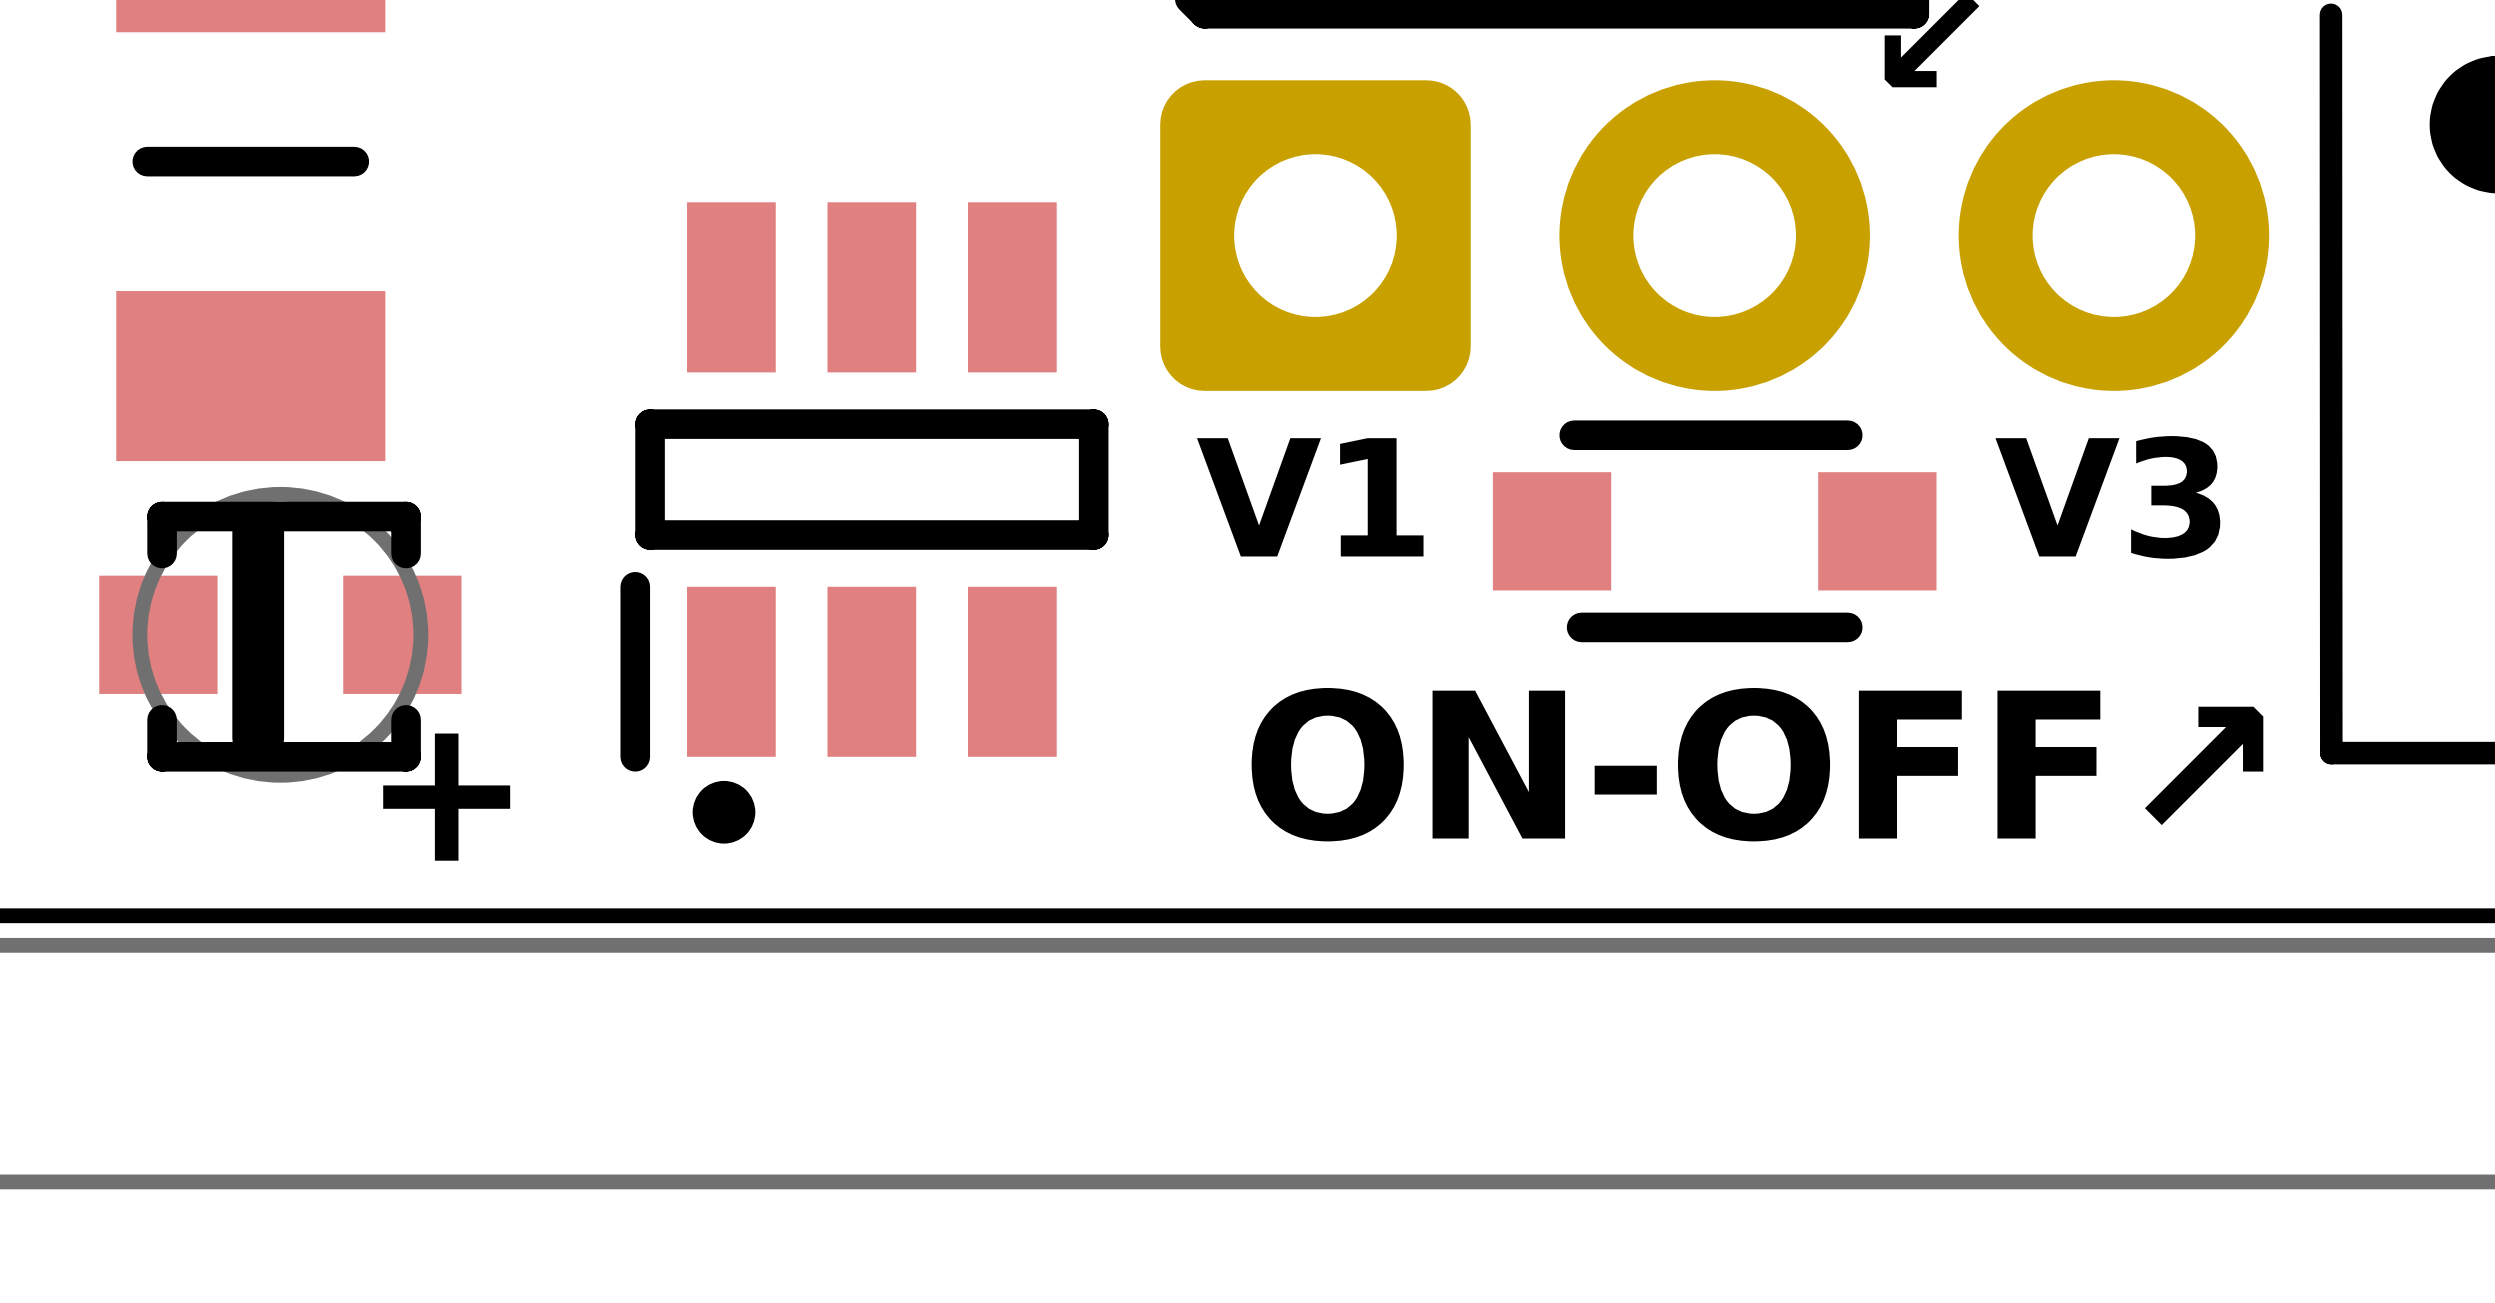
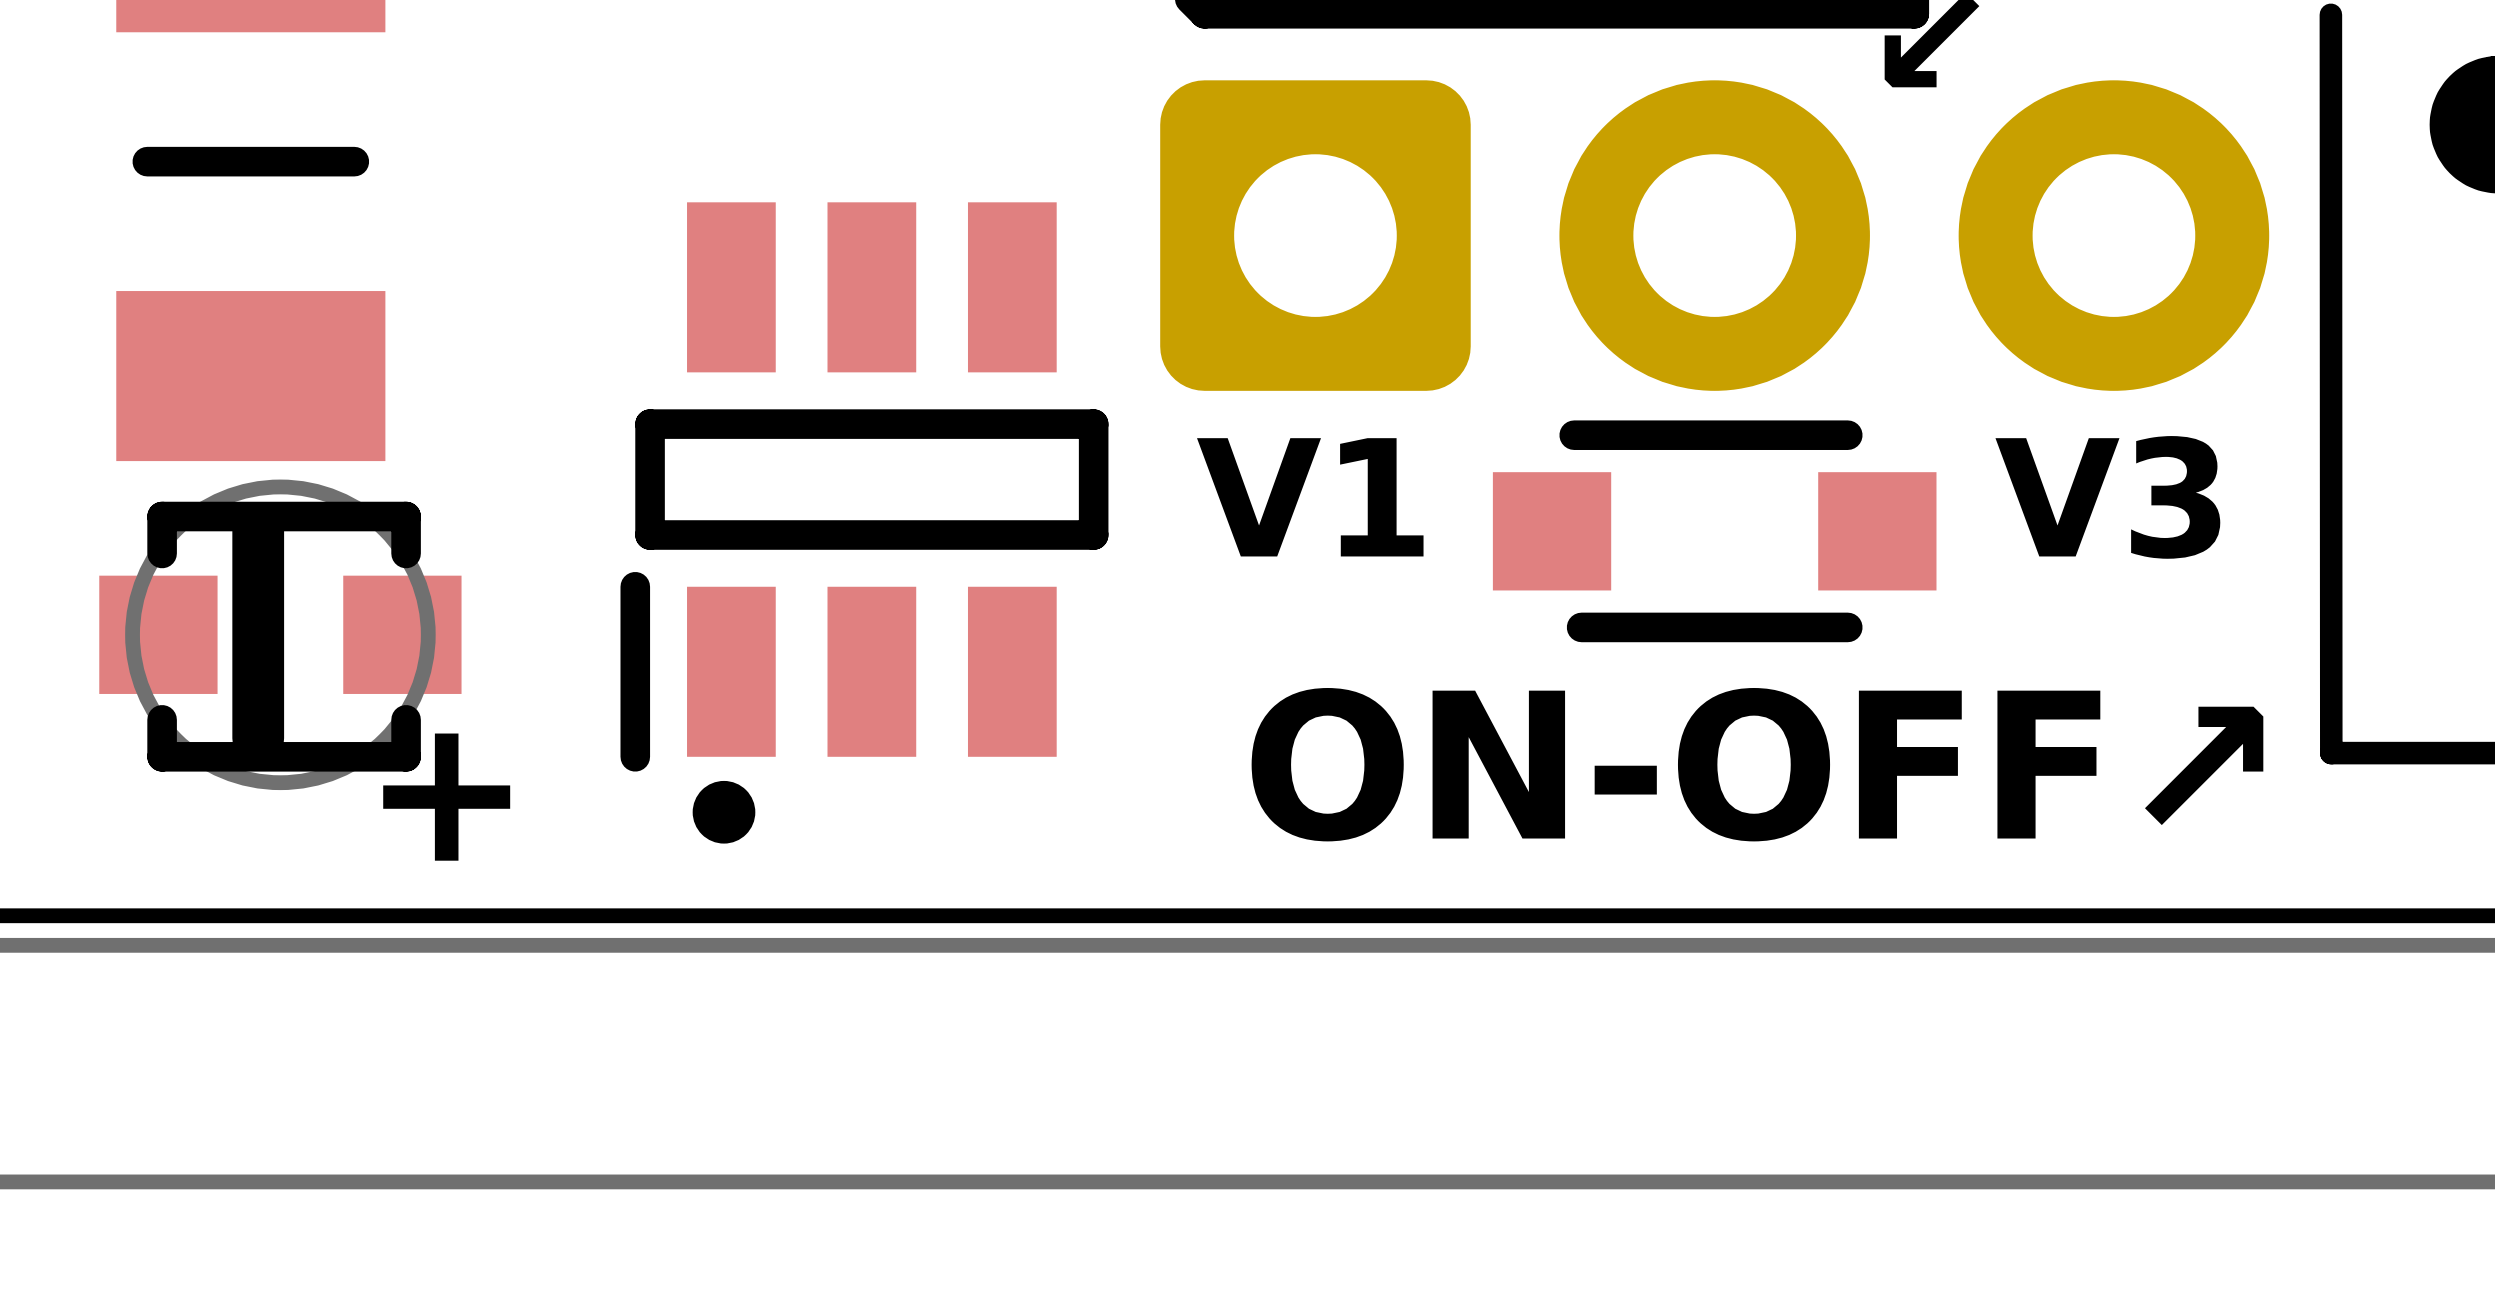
drawing shape: [132, 486, 429, 783] -> [125, 479, 436, 791]

